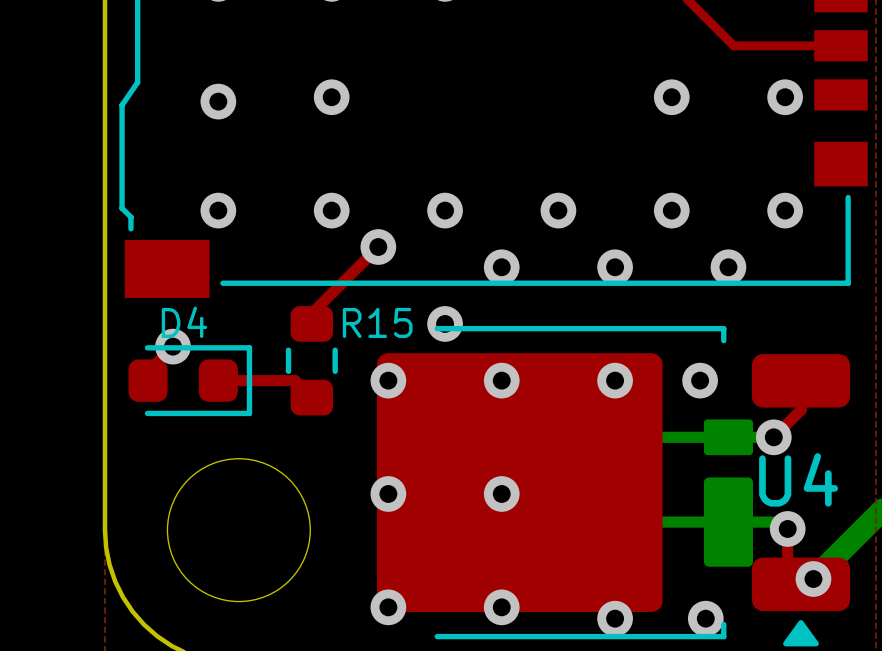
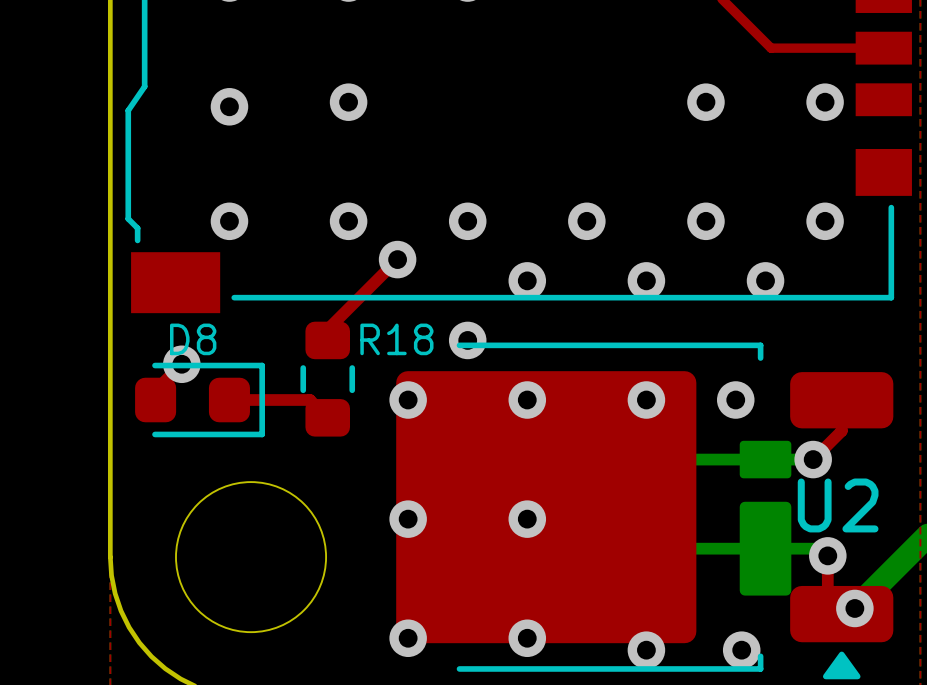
D4 name: D4 (184, 322) -> D8 (193, 339)
R15 name: R15 (377, 322) -> R18 (396, 339)
U4 name: U4 (798, 479) -> U2 (838, 505)

